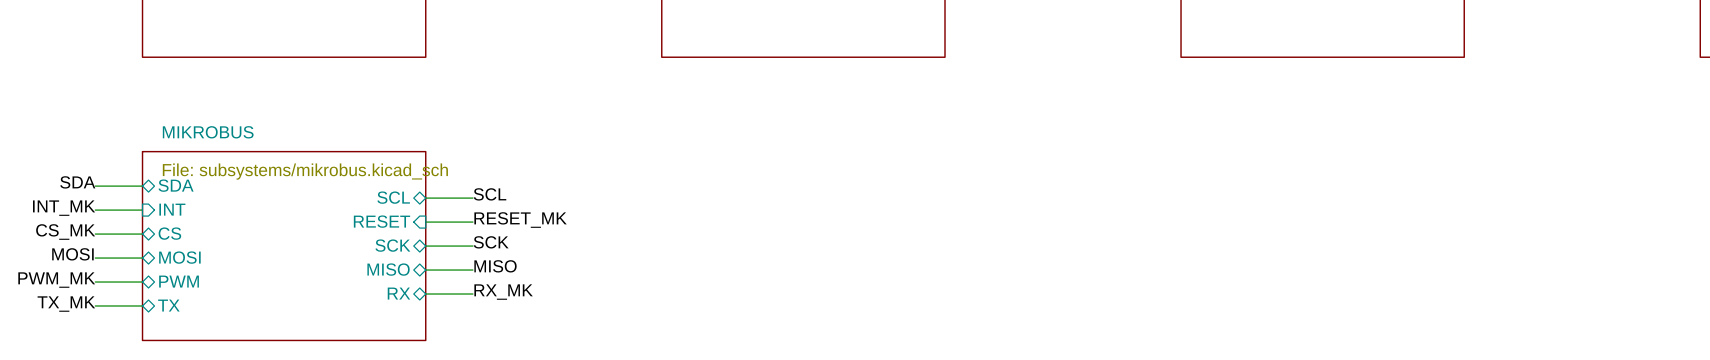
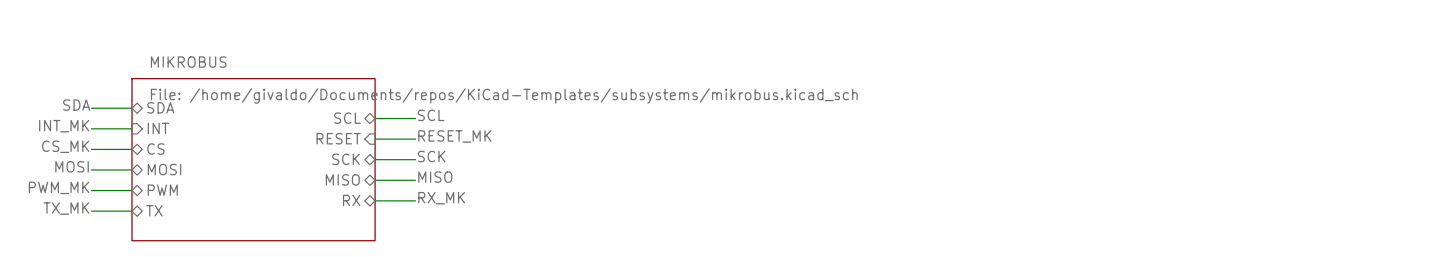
sheet MIKROBUS value: File: subsystems/mikrobus.kicad_sch (305, 171) -> File: /home/givaldo/Documents/repos/KiCad-Templates/subsystems/mikrobus.kicad_sch (504, 95)

